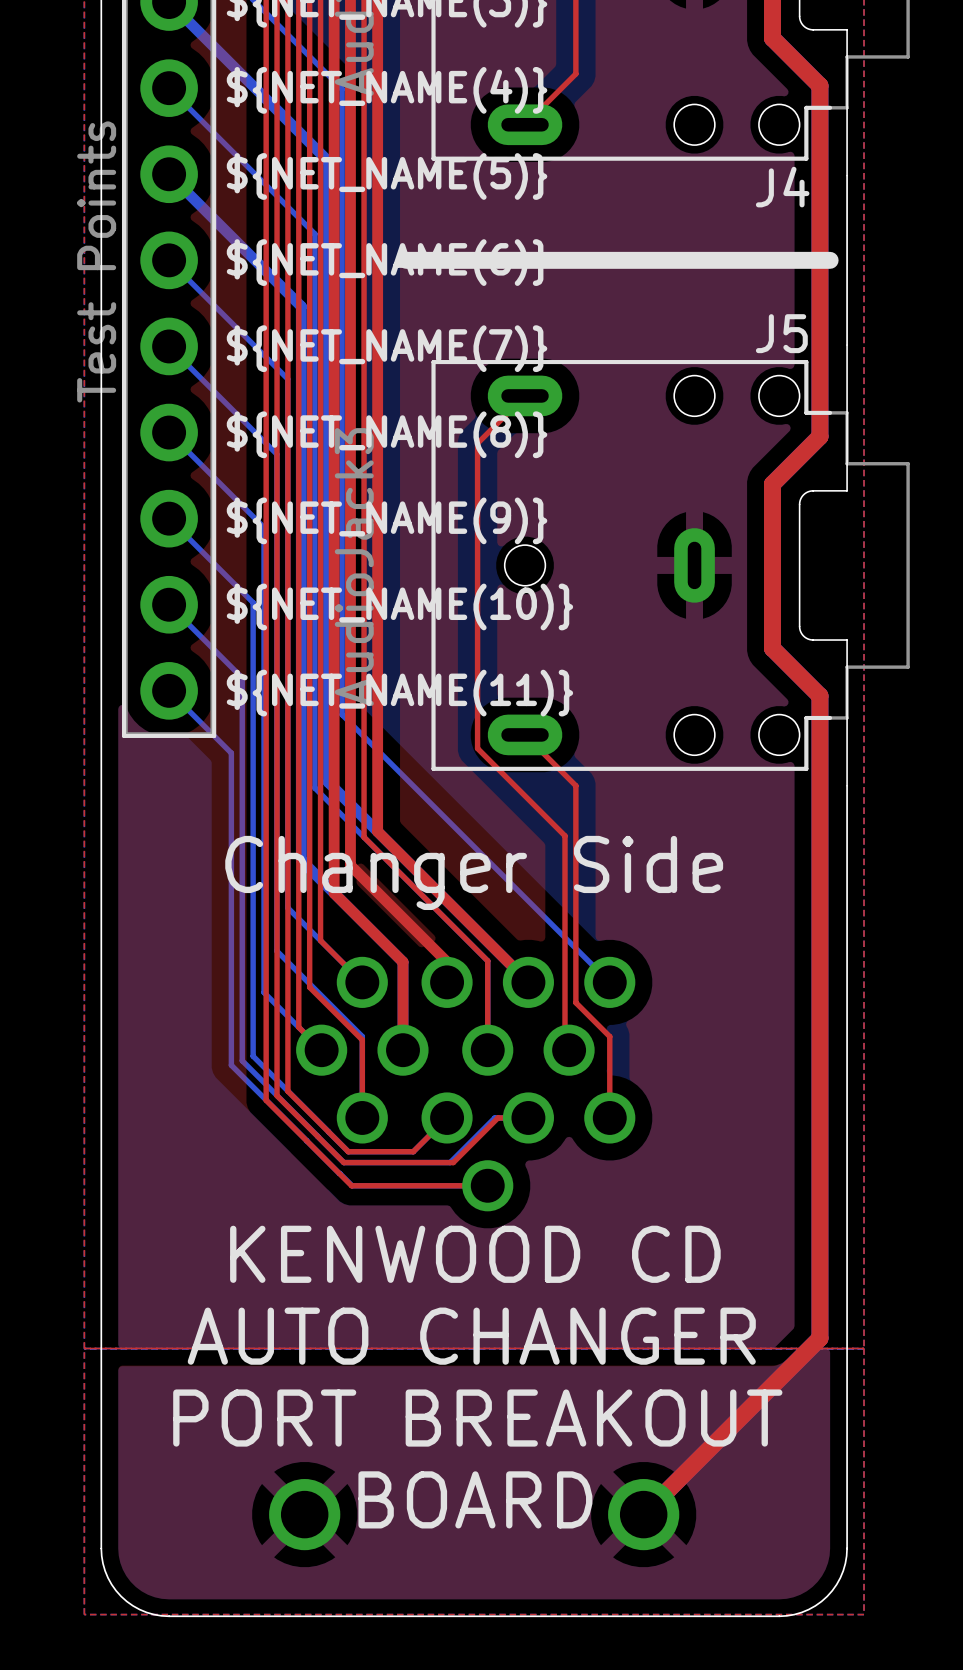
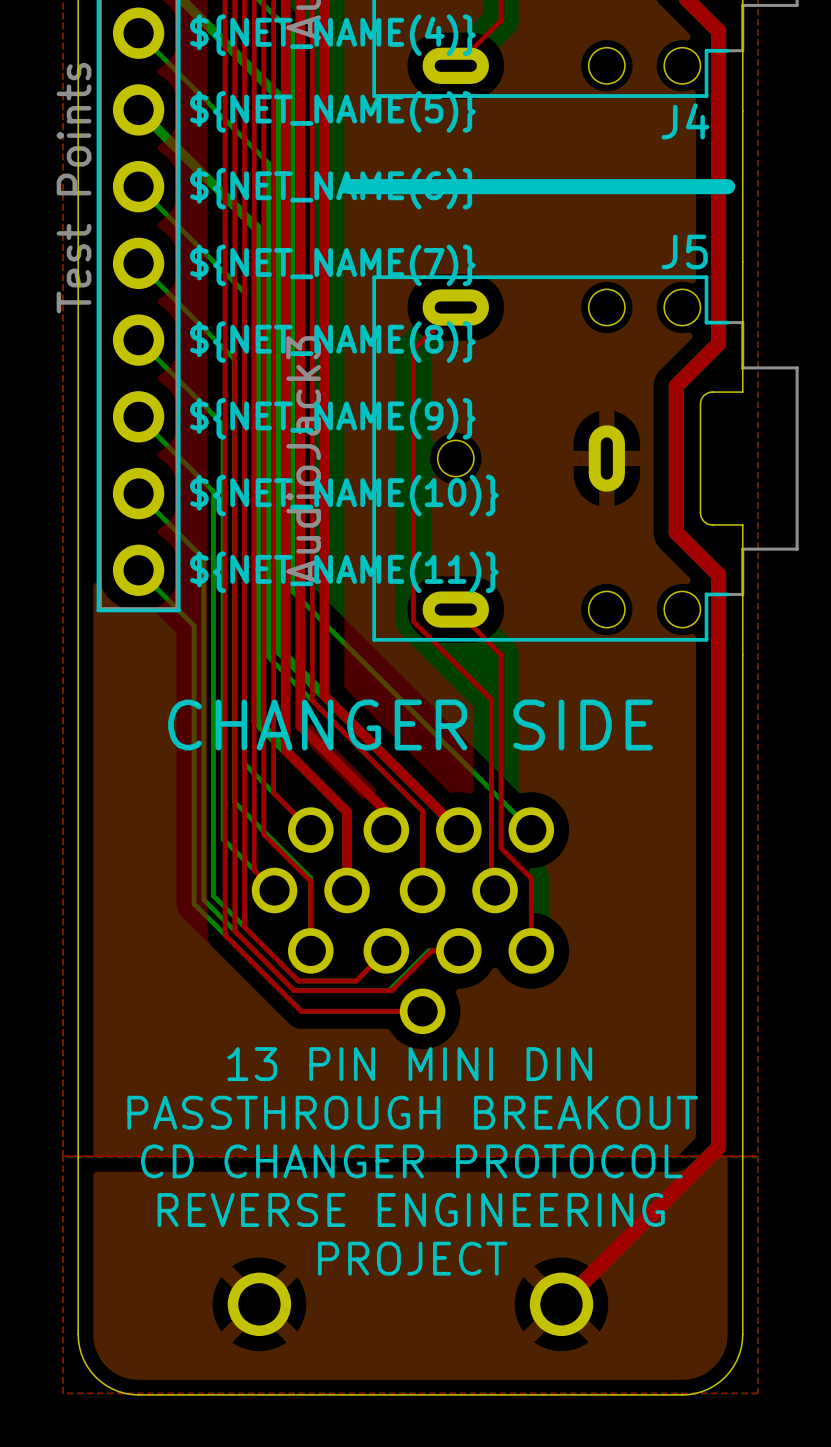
text: Changer Side (474, 872) -> CHANGER SIDE (410, 724)
text: KENWOOD CD (475, 1254) -> 13 PIN MINI DIN (409, 1064)
text: none -> PASSTHROUGH BREAKOUT (412, 1112)
text: AUTO CHANGER (471, 1336) -> none
text: none -> CD CHANGER PROTOCOL (411, 1161)
text: PORT BREAKOUT (477, 1418) -> REVERSE ENGINEERING (411, 1210)
text: BOARD (475, 1499) -> PROJECT (412, 1258)

